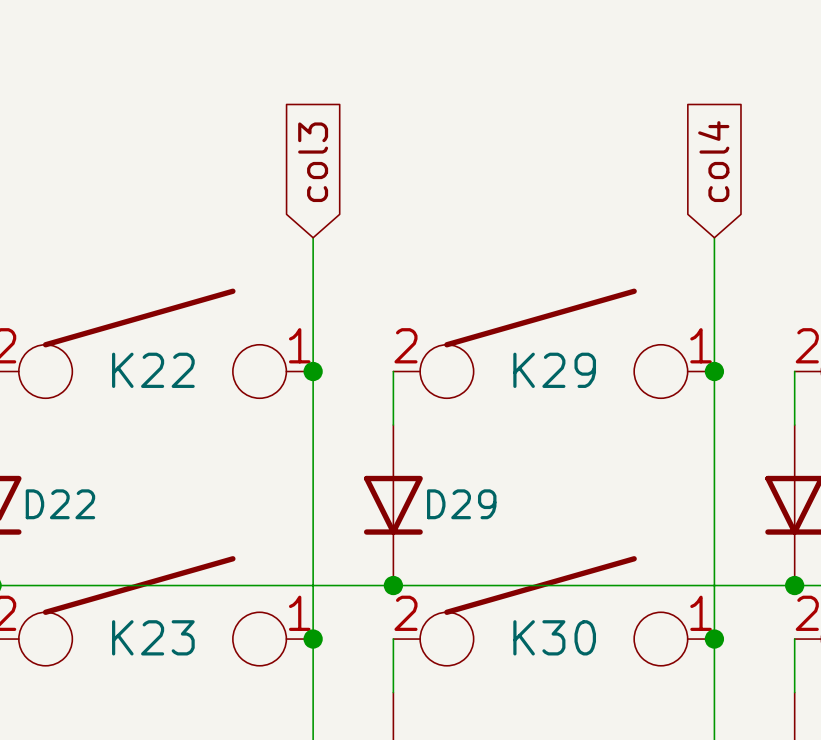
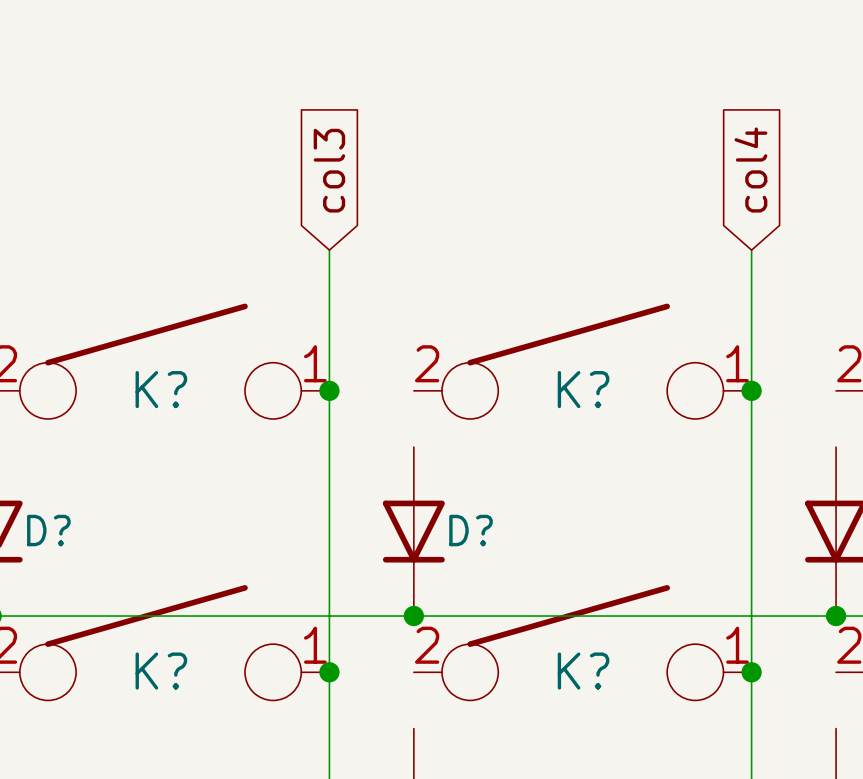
K22 name: K22 (153, 370) -> K? (161, 389)
K29 name: K29 (554, 370) -> K? (583, 389)
wire: (393, 371) (393, 425) -> none
wire: (794, 371) (794, 425) -> none
D22 name: D22 (60, 504) -> D? (48, 530)
D29 name: D29 (461, 504) -> D? (471, 530)
K23 name: K23 (153, 637) -> K? (161, 671)
K30 name: K30 (554, 637) -> K? (583, 671)
wire: (393, 639) (393, 692) -> none
wire: (794, 639) (794, 692) -> none

